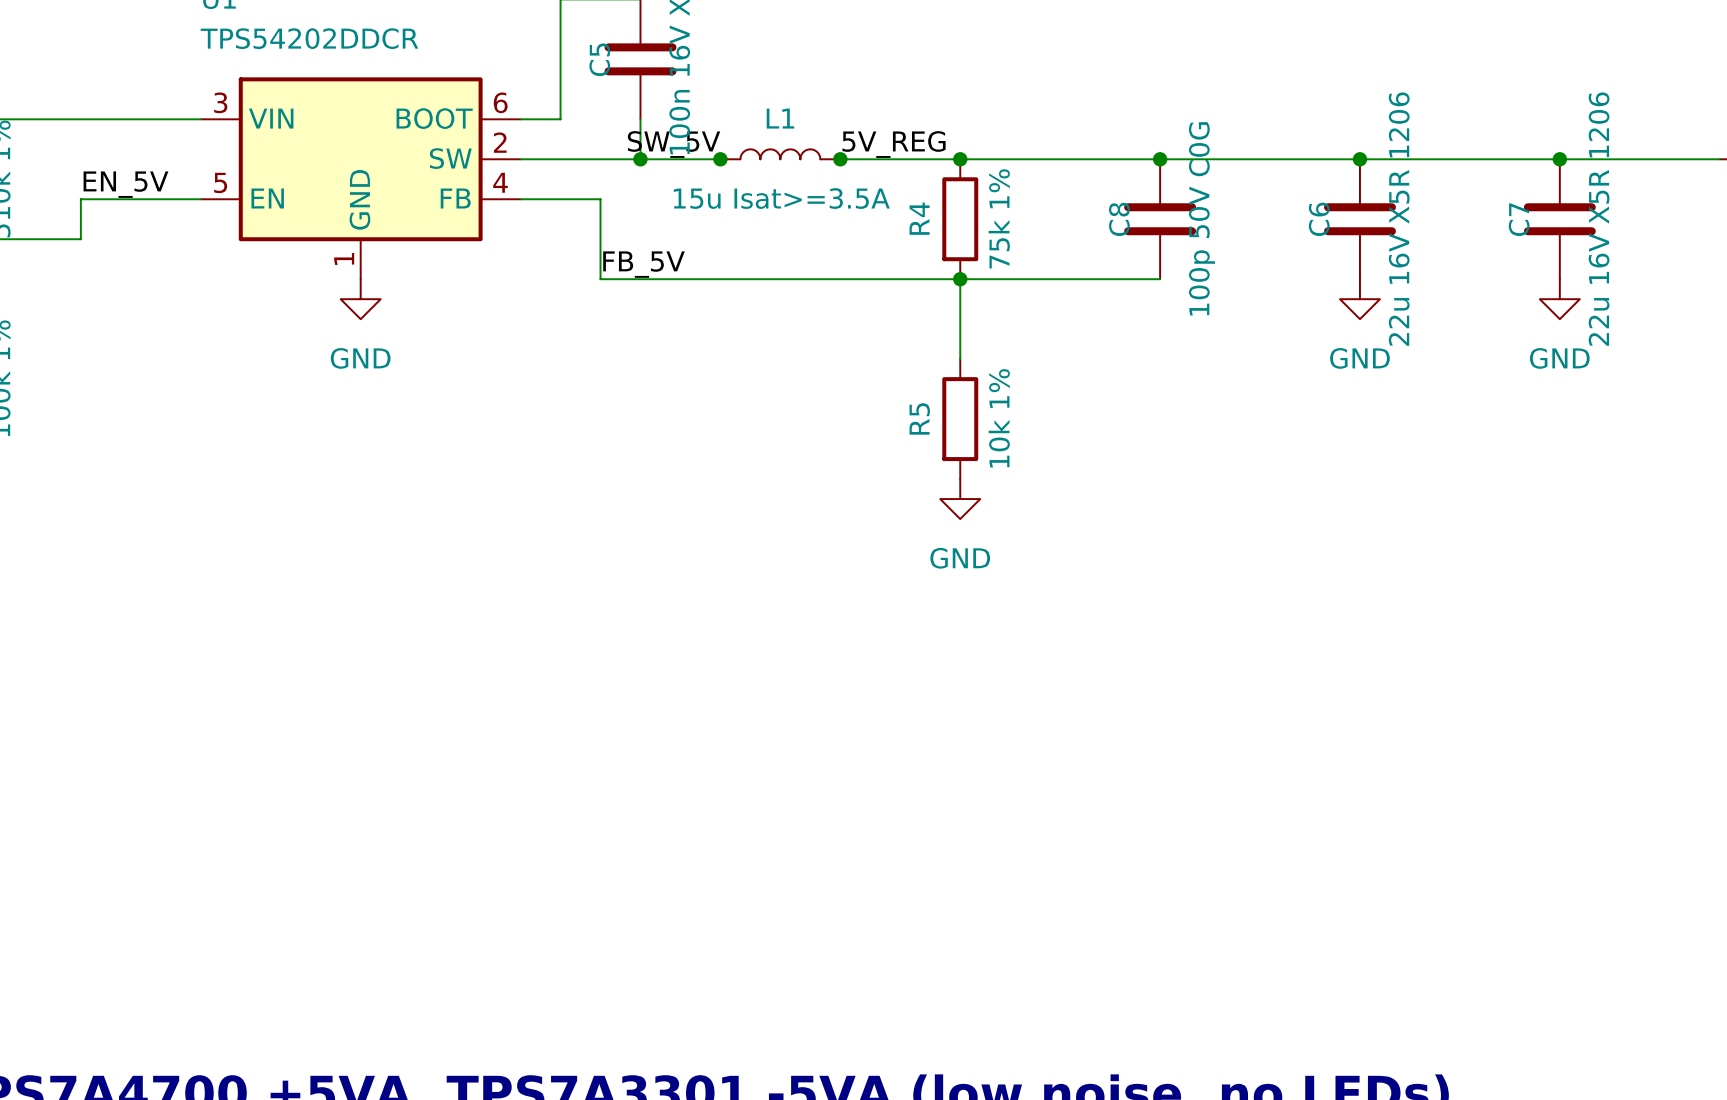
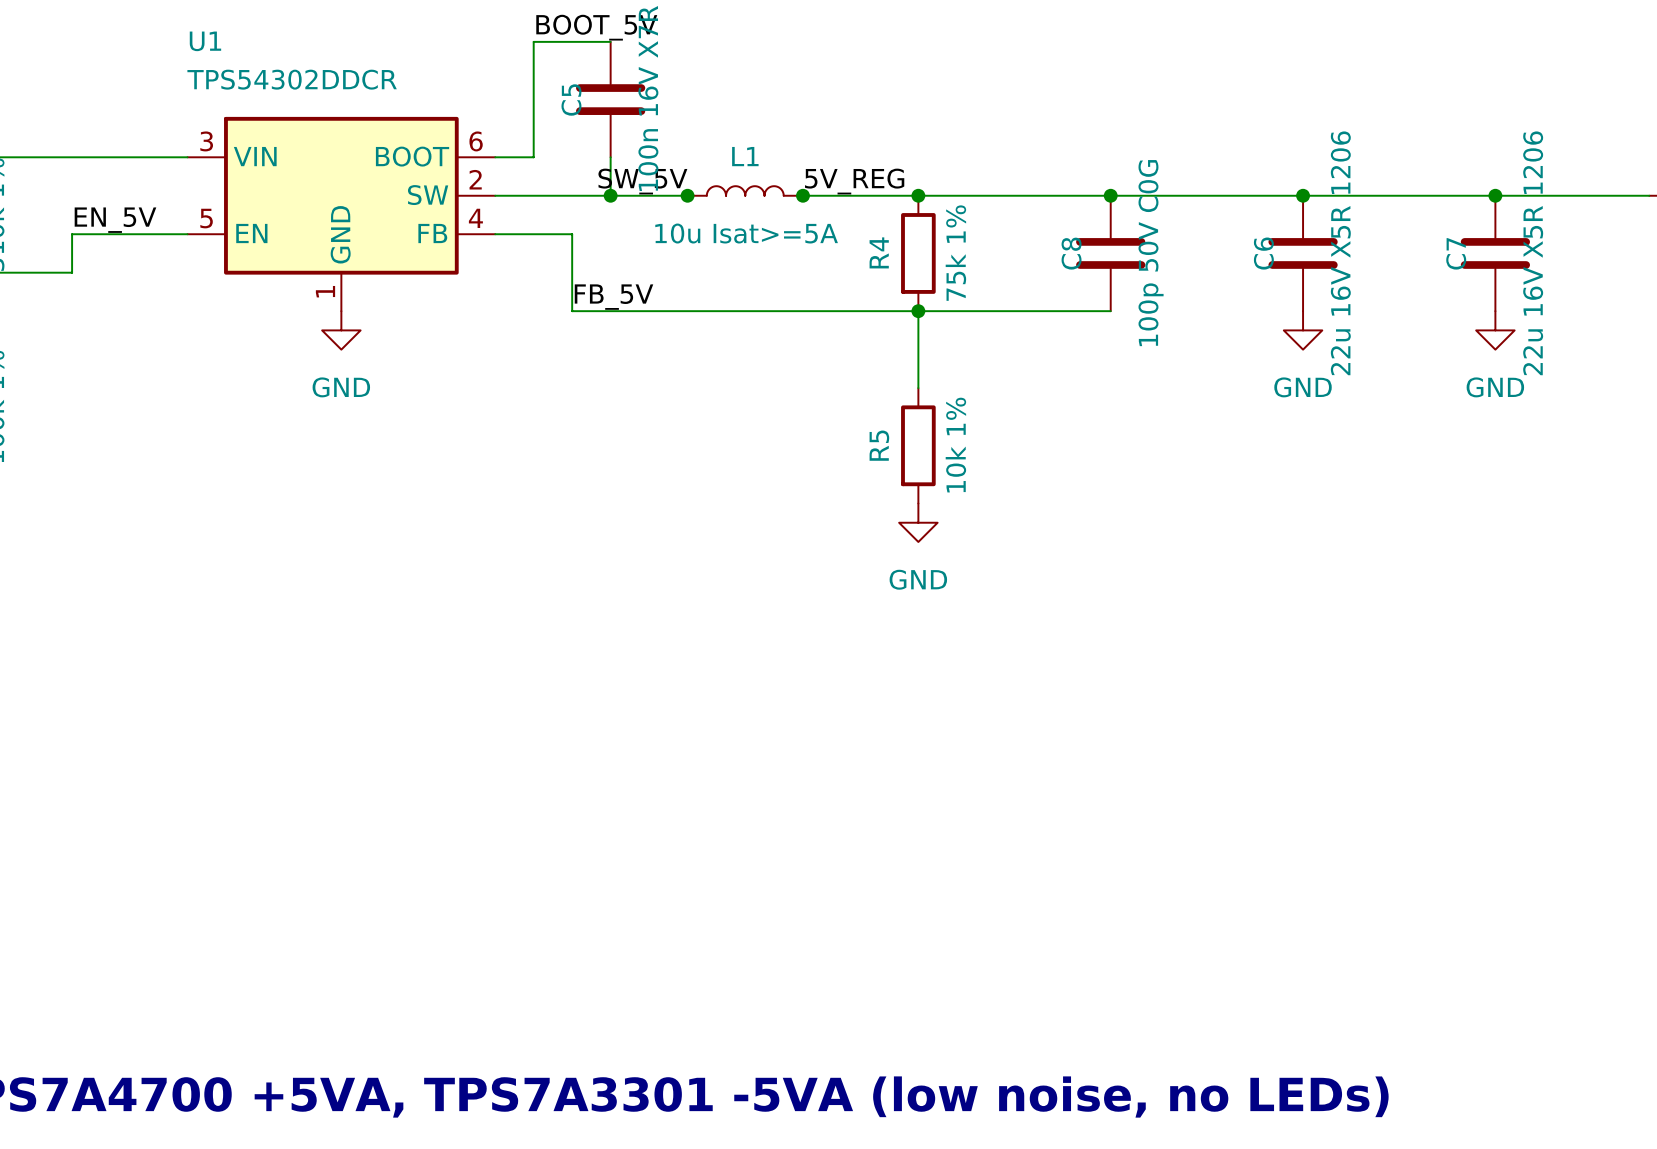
U1 value: TPS54202DDCR (309, 38) -> TPS54302DDCR (292, 79)
L1 value: 15u Isat>=3.5A (781, 198) -> 10u Isat>=5A (746, 233)

